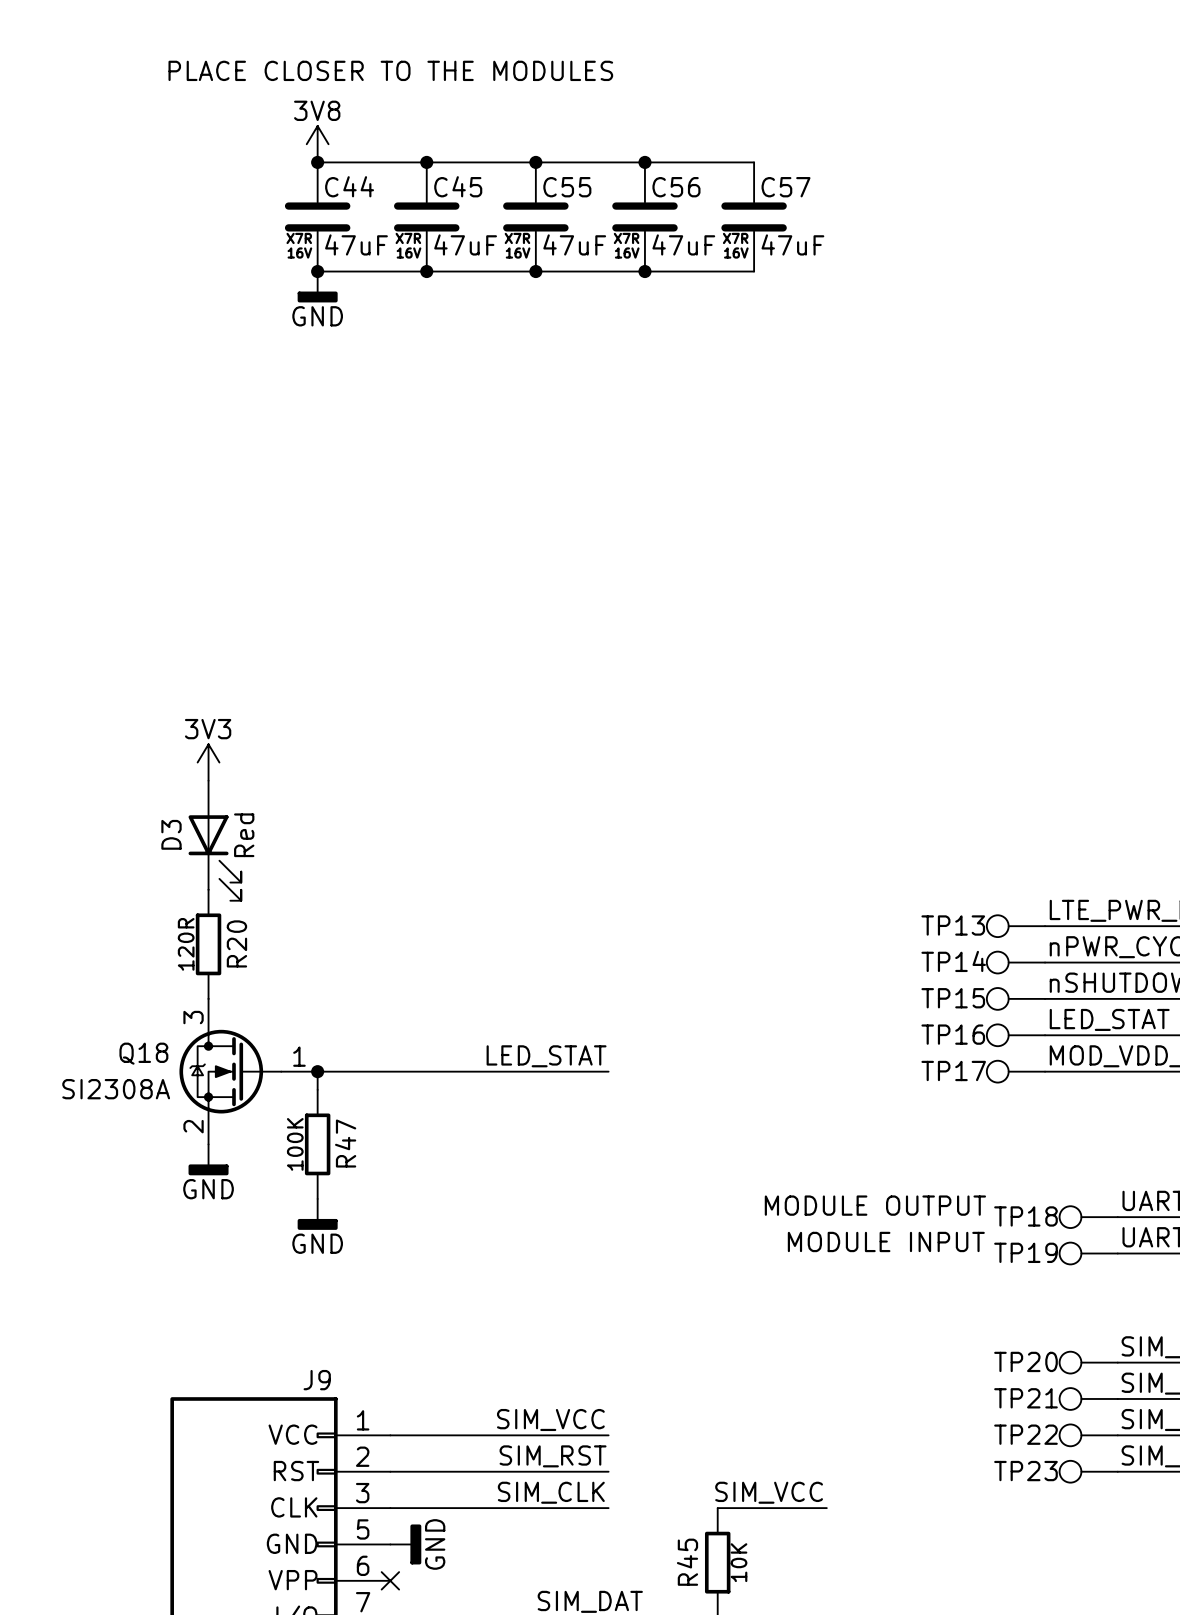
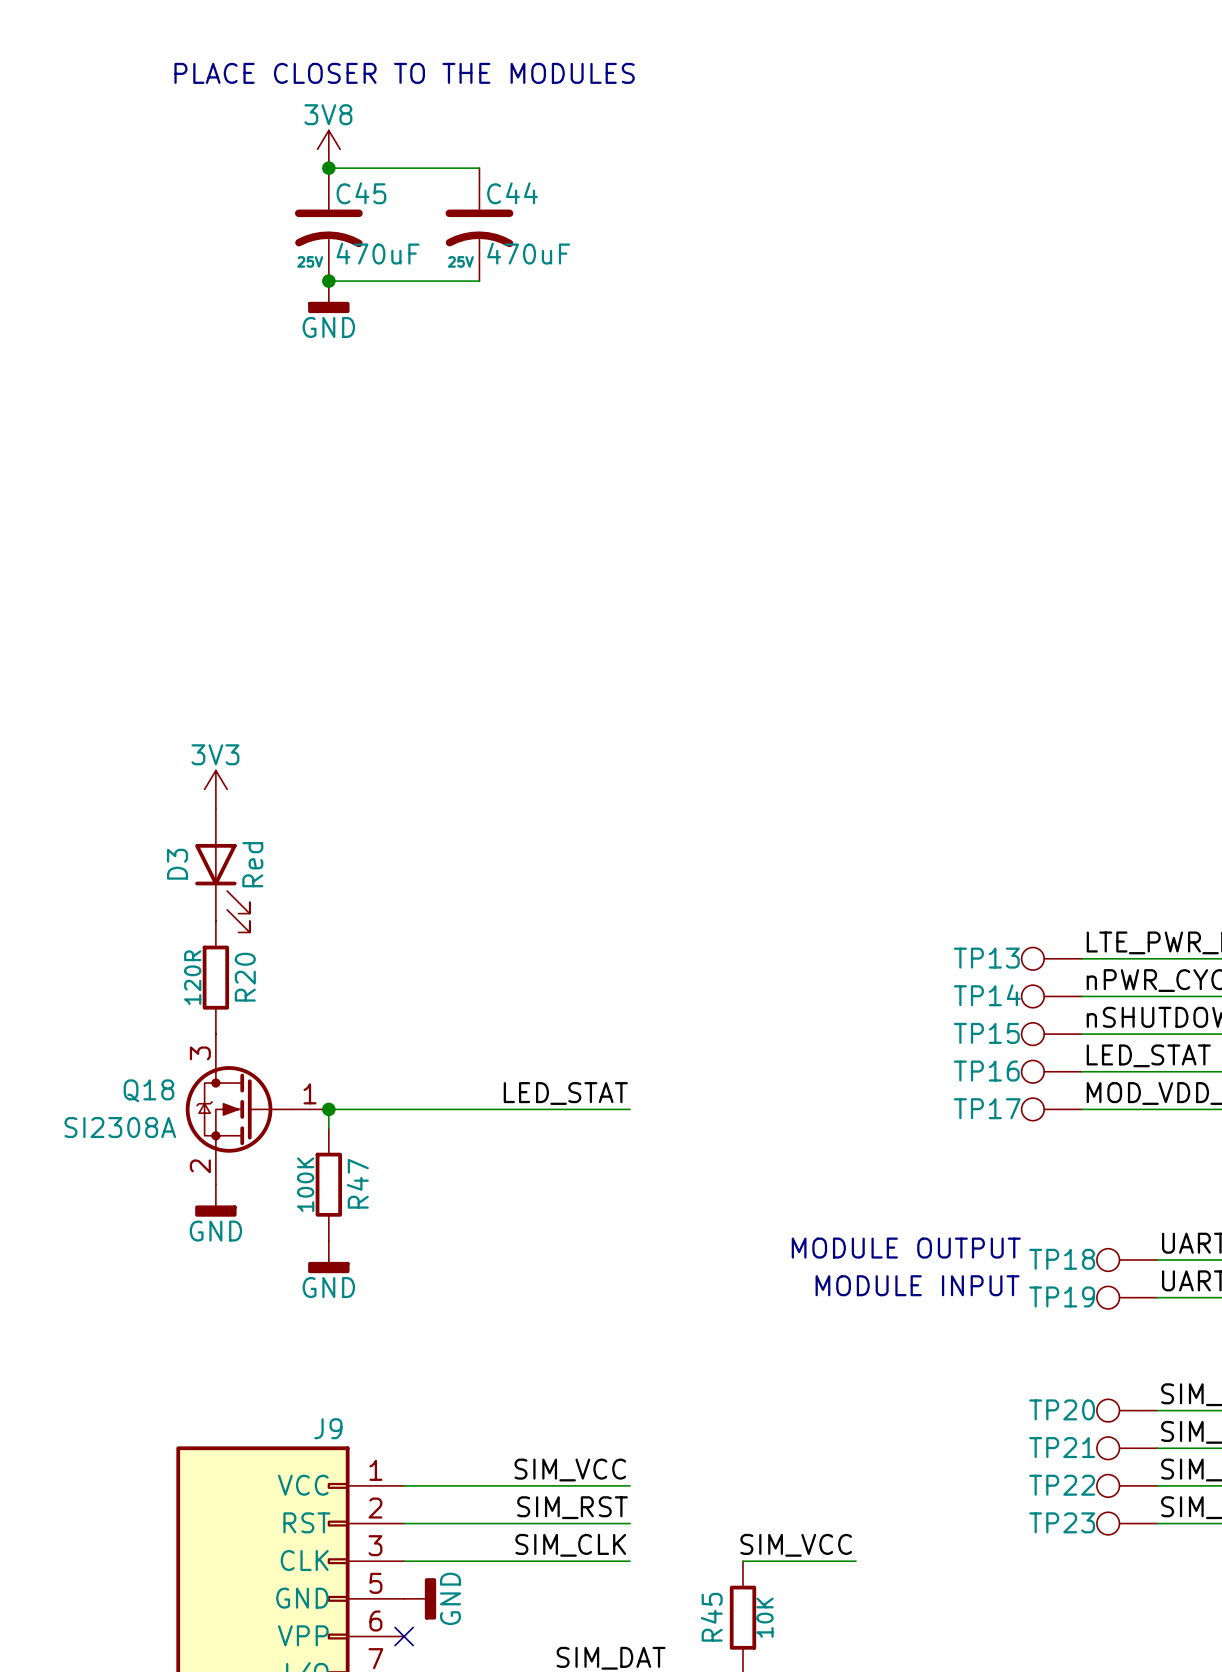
C44 symbol: [284, 162, 351, 272] -> [445, 168, 514, 282]
C45 symbol: [394, 162, 460, 272] -> [294, 168, 363, 282]
junction: (426, 162) -> none
wire: (463, 162) (754, 162) -> none
junction: (535, 162) -> none
junction: (644, 162) -> none
C55: 47uF (535, 216) -> none
C56: 47uF (644, 216) -> none
C57: 47uF (754, 216) -> none
C44 text: X7R (299, 238) -> none
C45 text: X7R (408, 238) -> none
C44 value: 47uF (356, 244) -> 470uF (528, 253)
C45 value: 47uF (465, 244) -> 470uF (378, 253)
C44 text: 16V (299, 253) -> 25V (460, 261)
C45 text: 16V (409, 253) -> 25V (310, 261)
junction: (426, 271) -> none
wire: (463, 271) (754, 271) -> none
junction: (535, 271) -> none
junction: (644, 271) -> none

